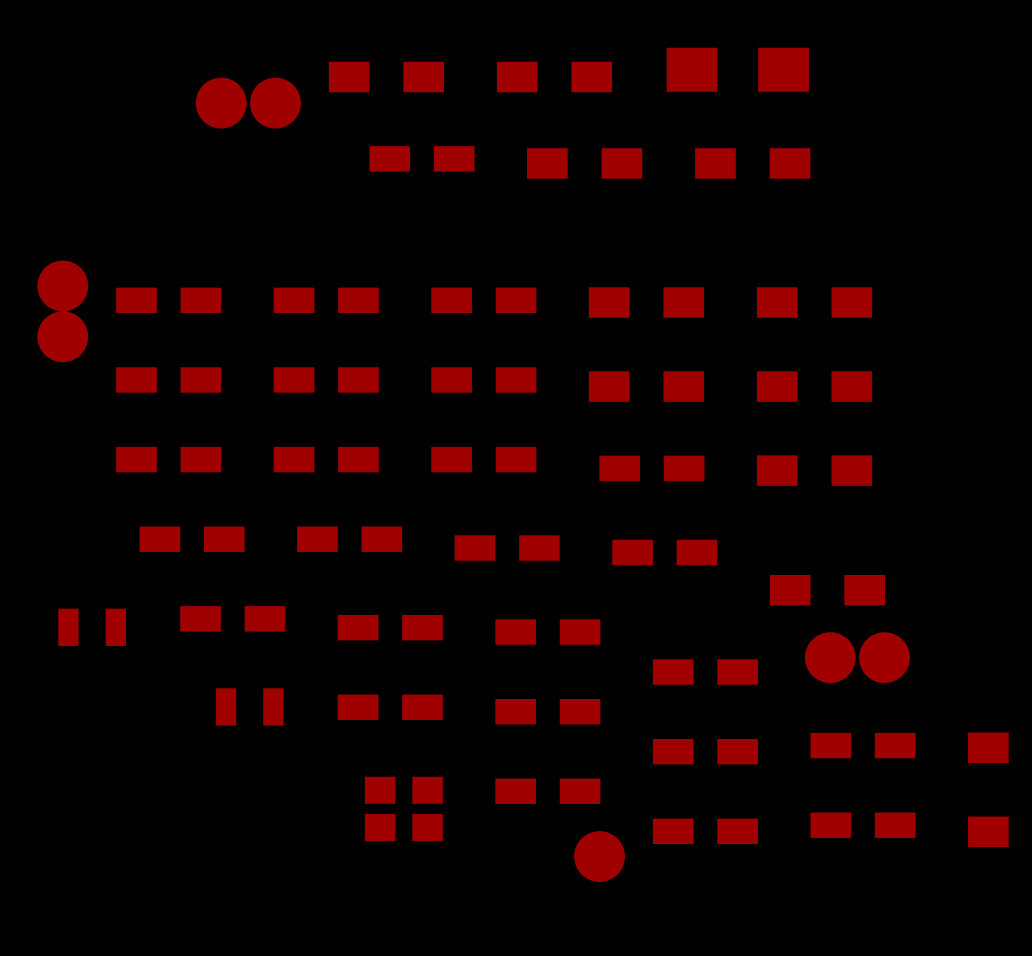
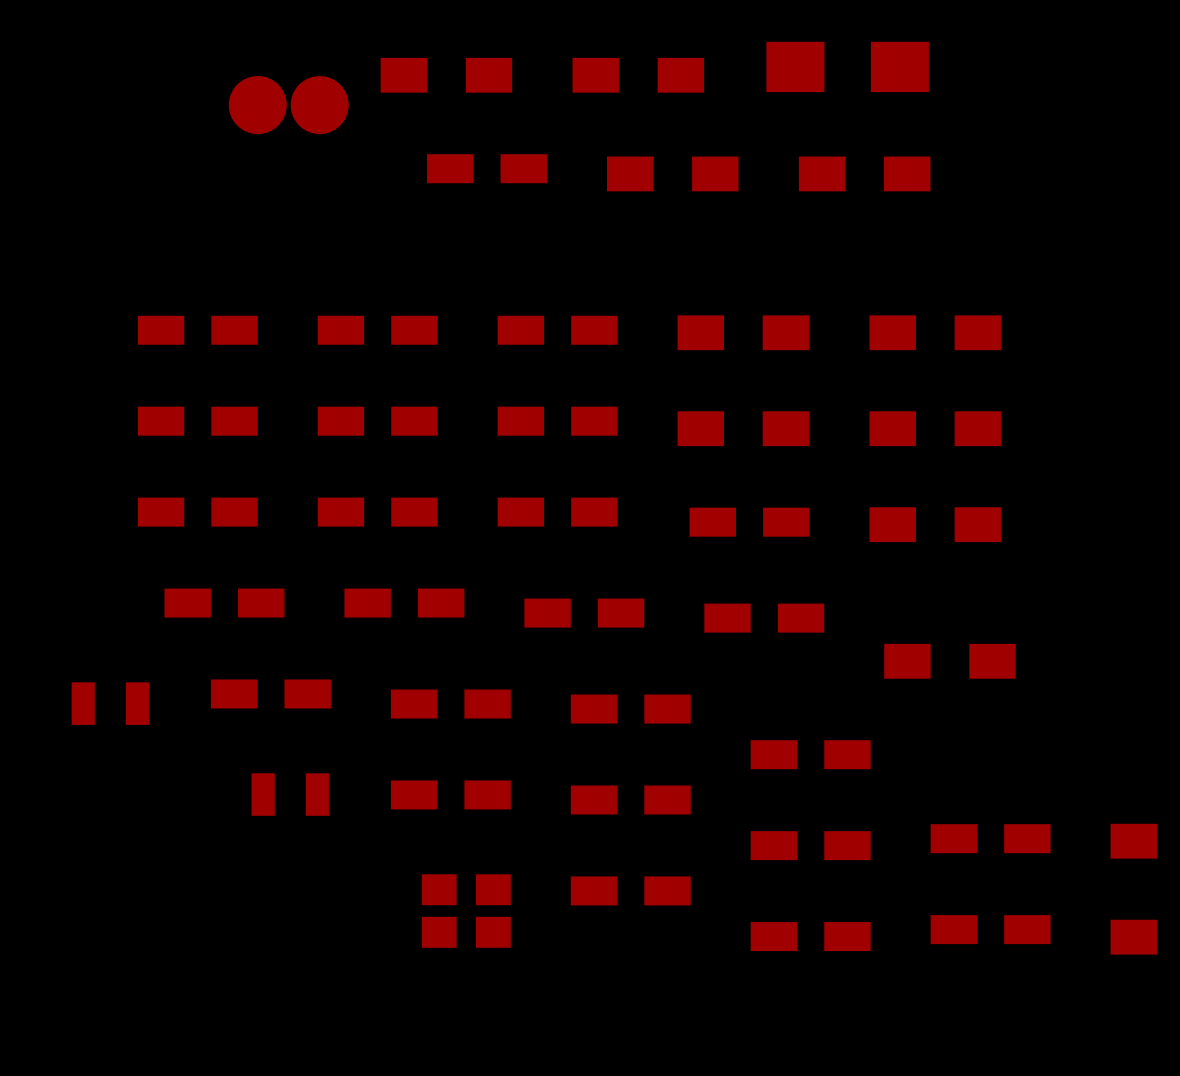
part: (62, 285) -> none
part: (62, 336) -> none
part: (830, 657) -> none
part: (884, 657) -> none
part: (599, 856) -> none

